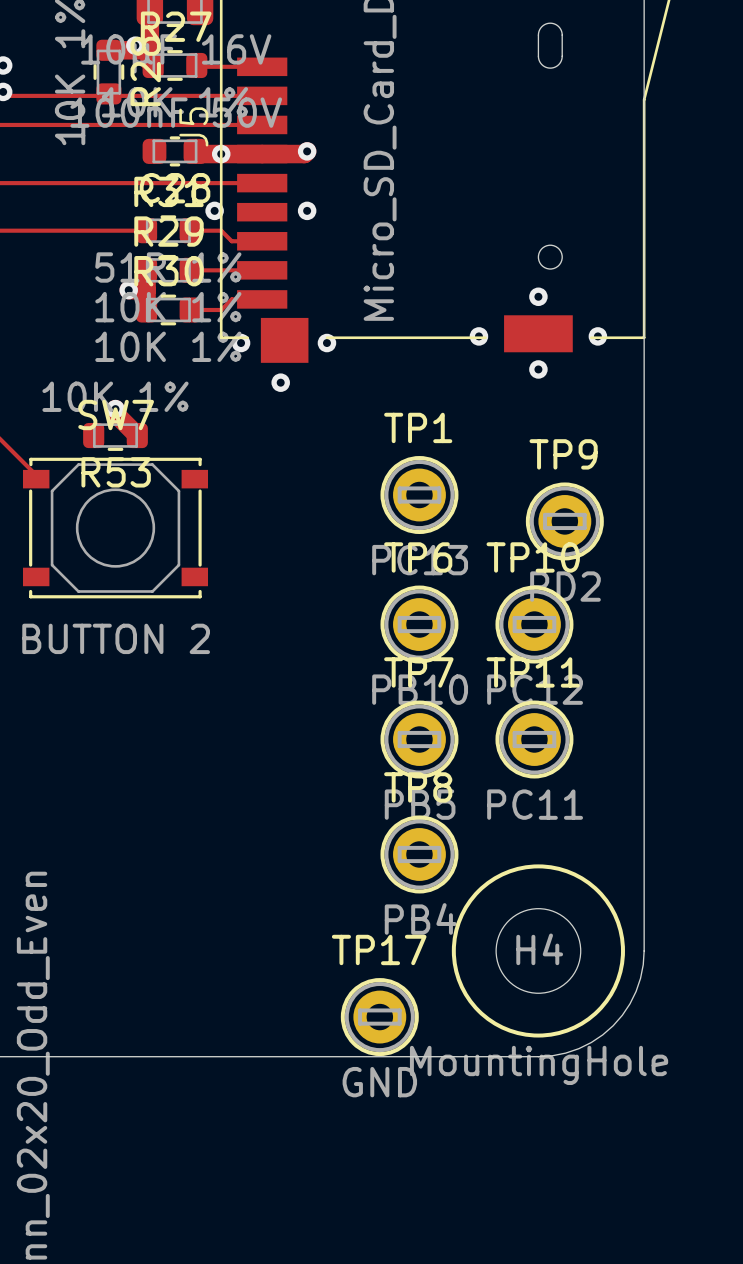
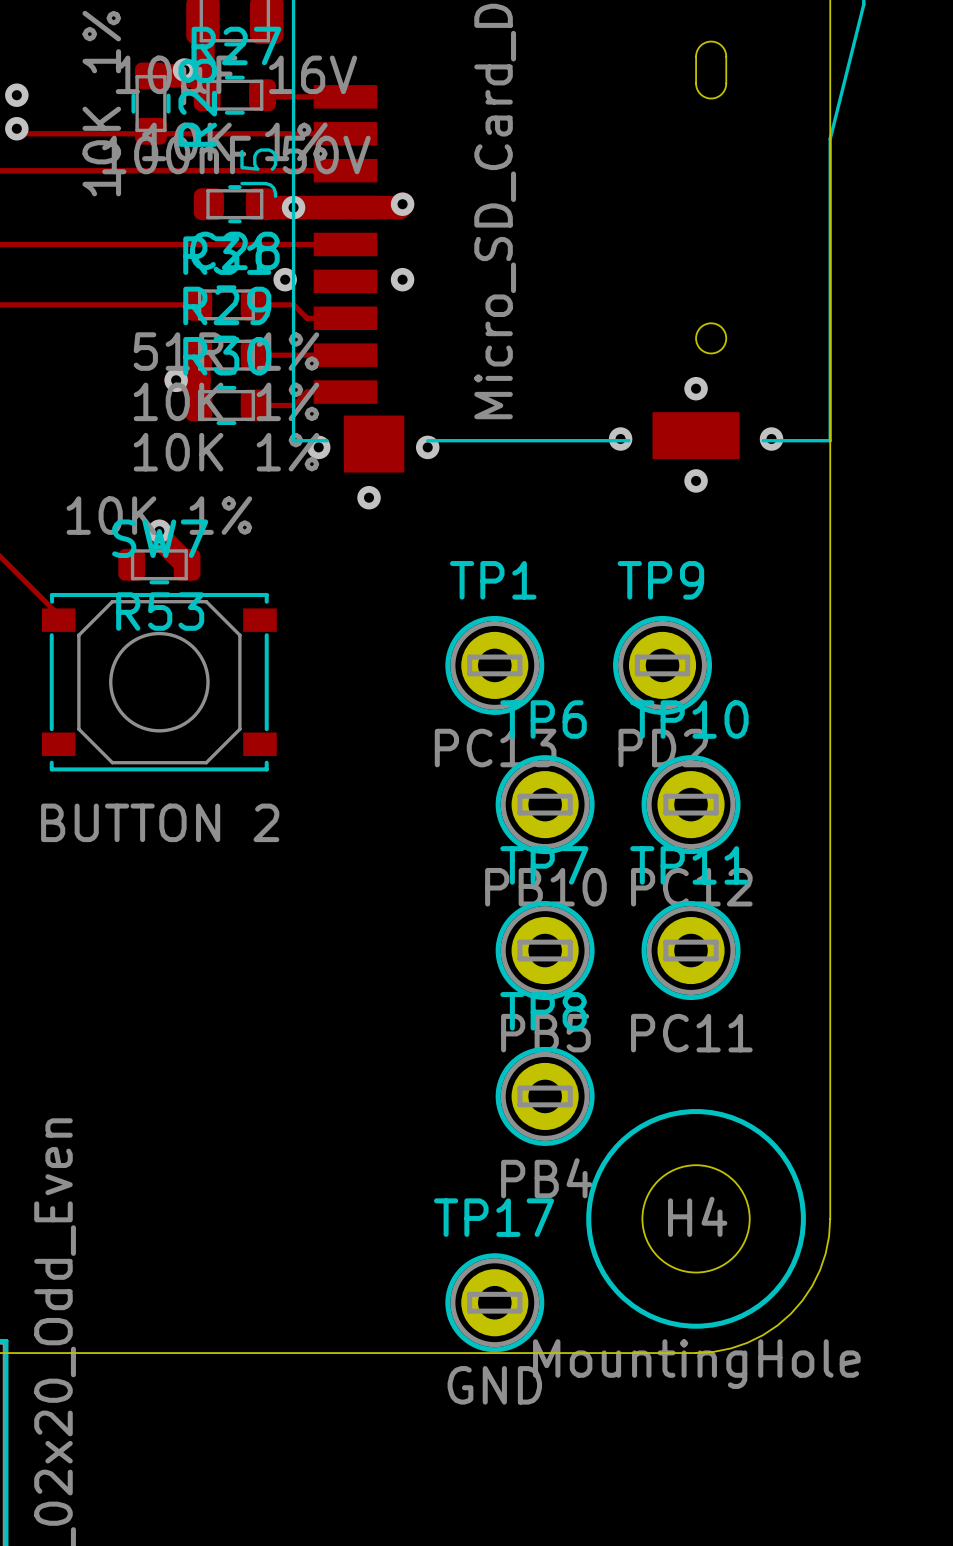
TP1 position: (419, 495) -> (494, 665)
TP9 position: (564, 521) -> (662, 665)

